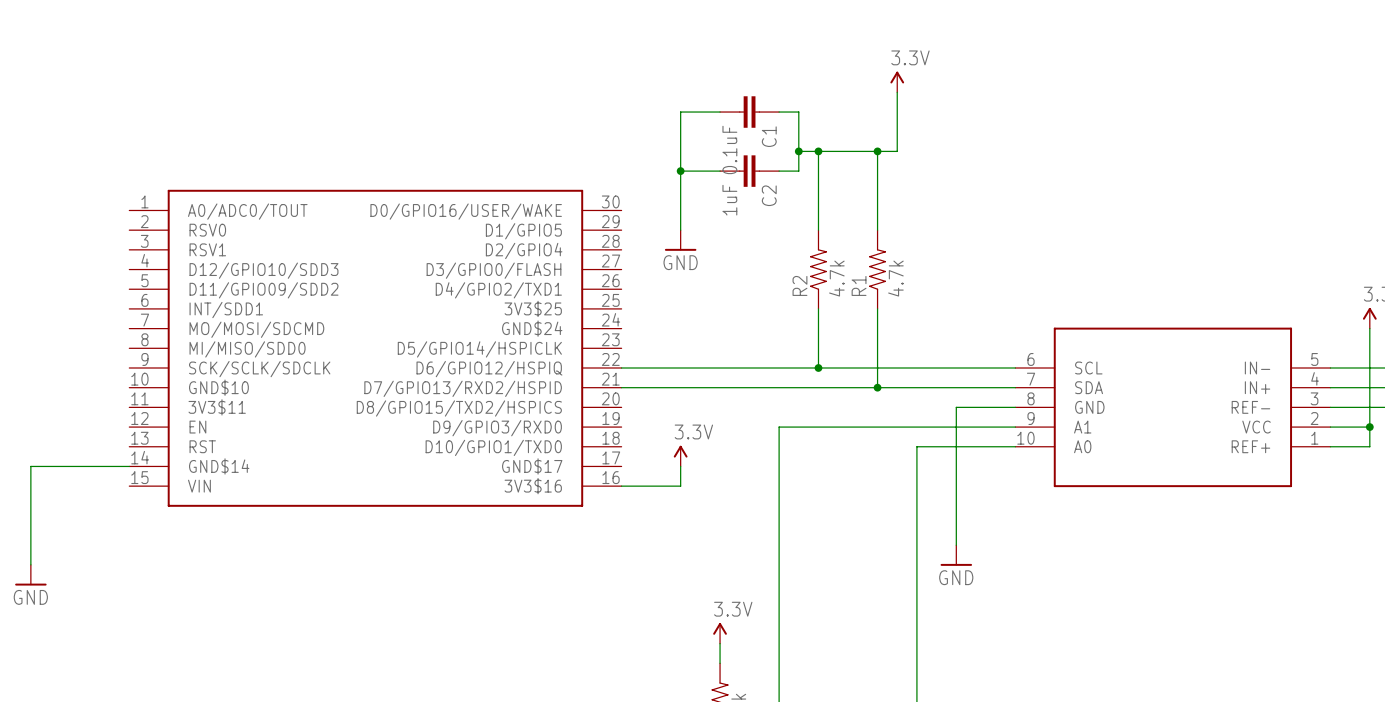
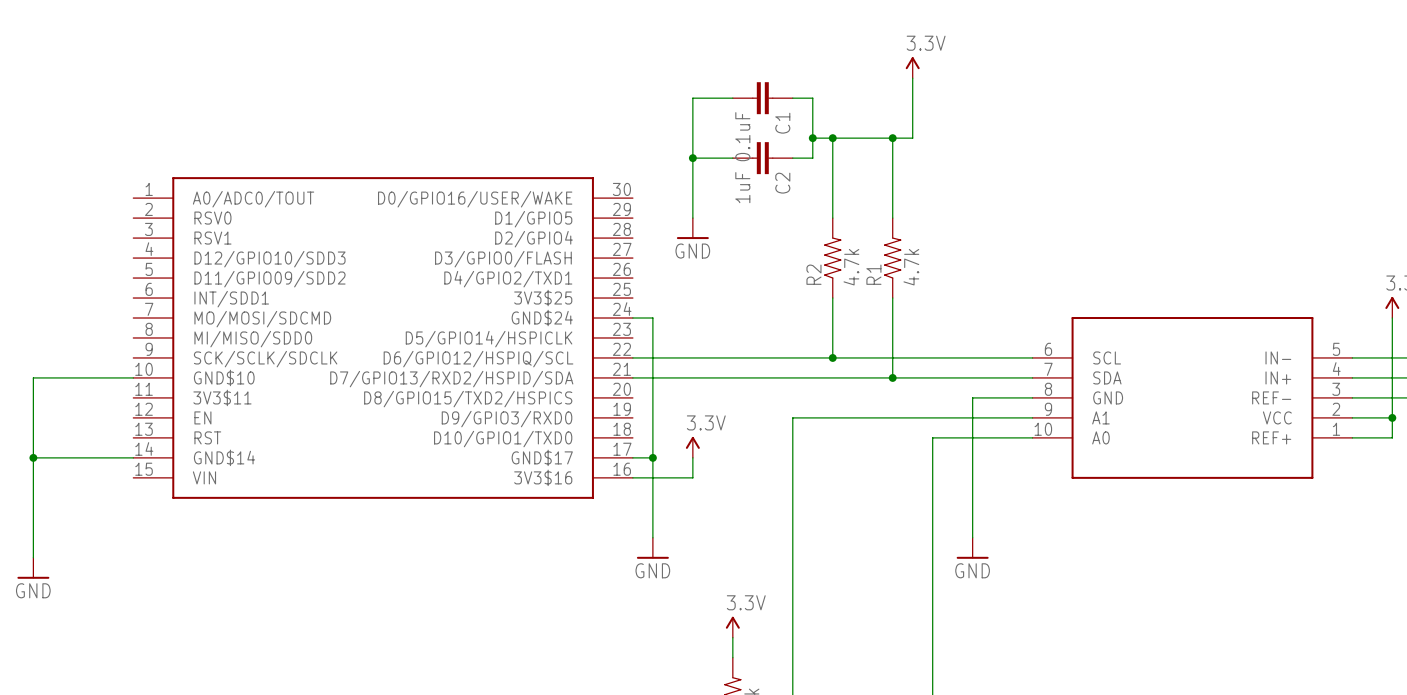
wire: none -> (632, 318) (652, 318) (652, 537)
part pin name: D6/GPIO12/HSPIQ (489, 369) -> D6/GPIO12/HSPIQ/SCL (478, 359)
wire: none -> (133, 377) (33, 377) (33, 457)
part pin name: D7/GPIO13/RXD2/HSPID (463, 388) -> D7/GPIO13/RXD2/HSPID/SDA (451, 379)
junction: none -> (33, 457)
wire: none -> (632, 457) (652, 457)
junction: none -> (652, 457)
power symbol: none -> GND (652, 548)

